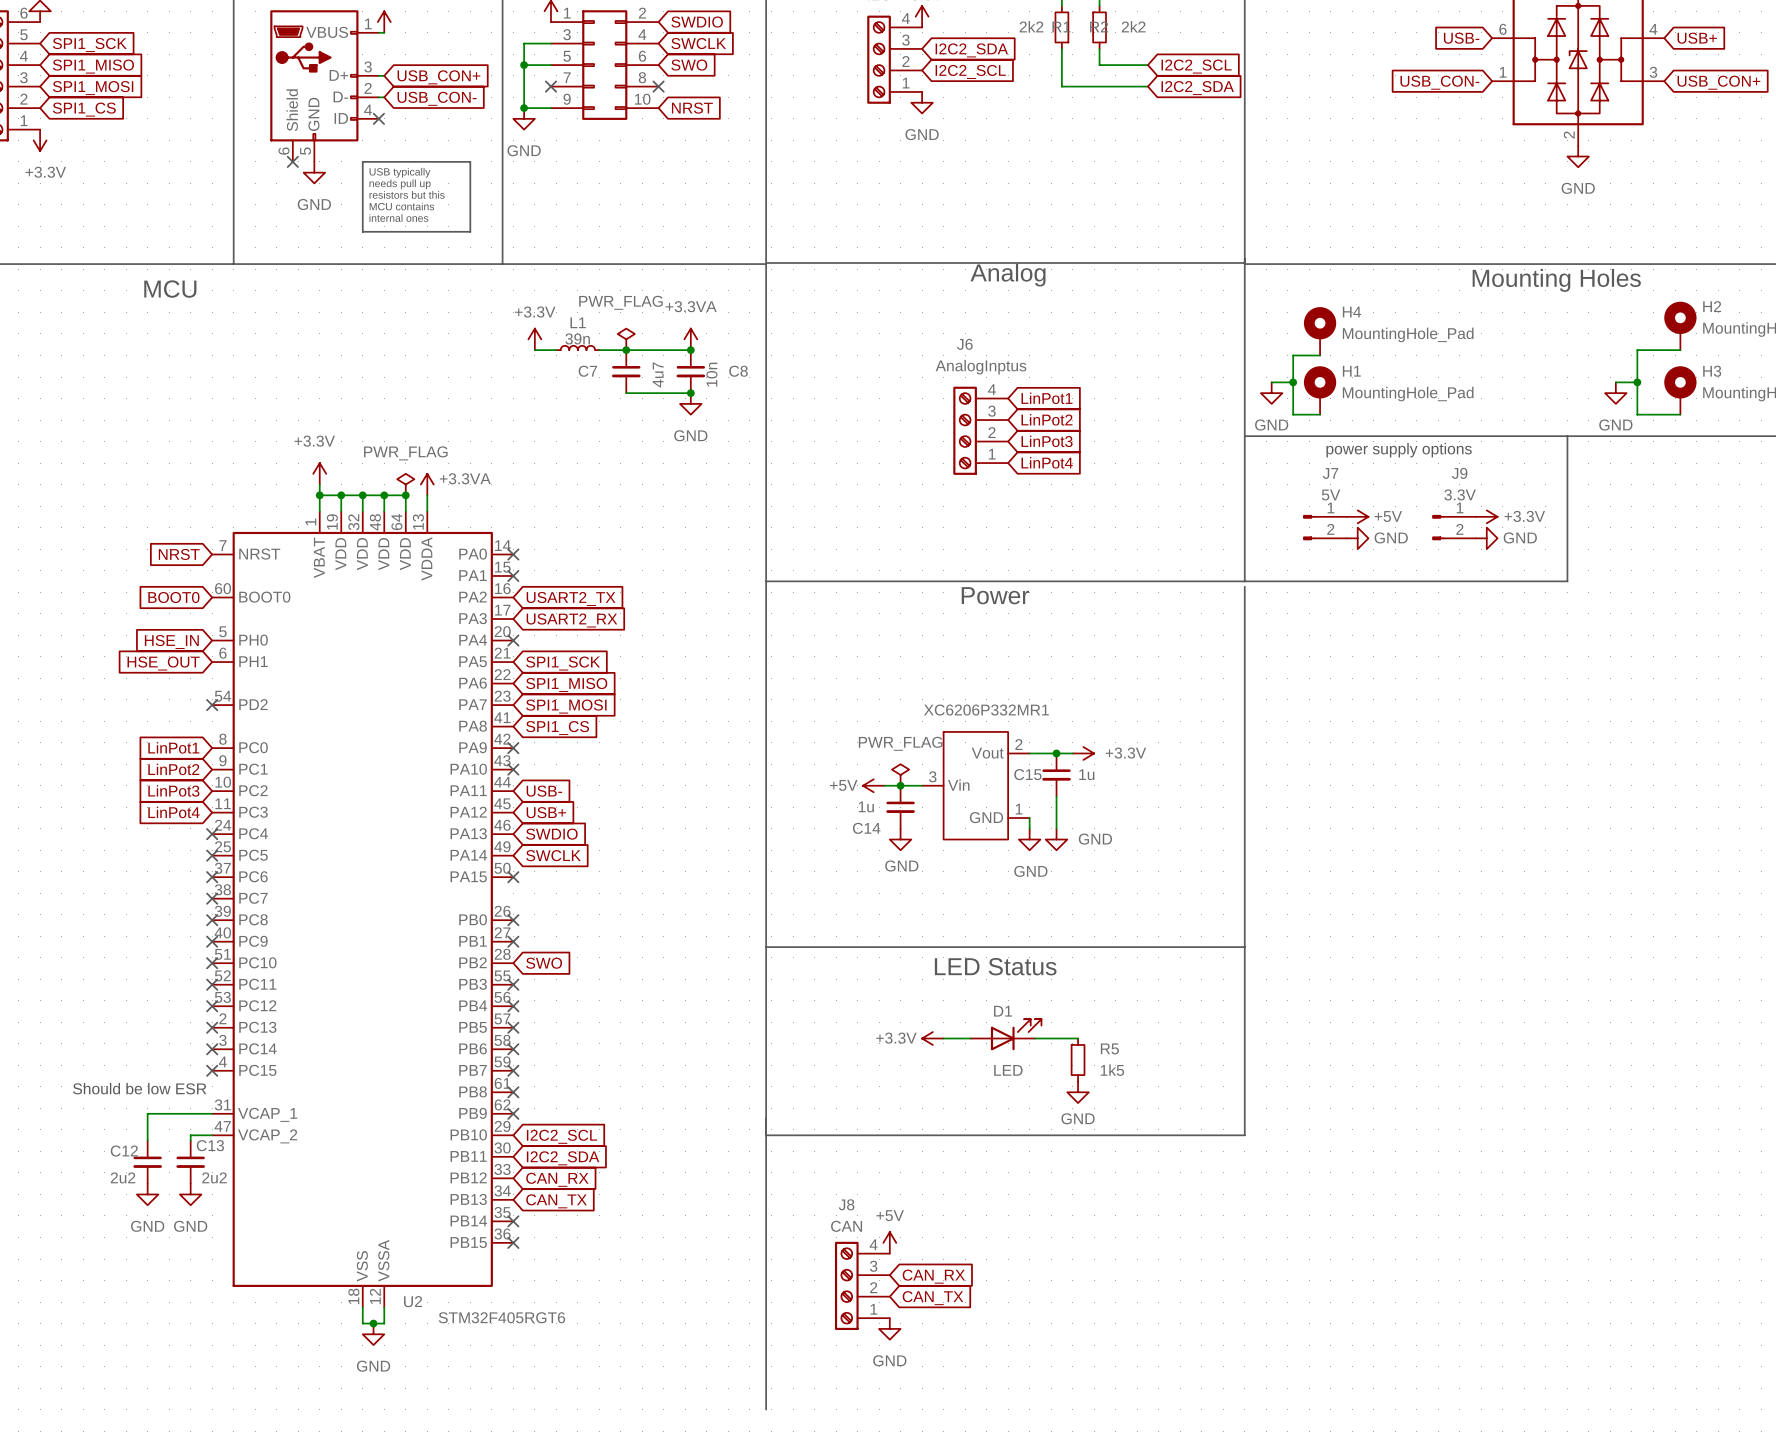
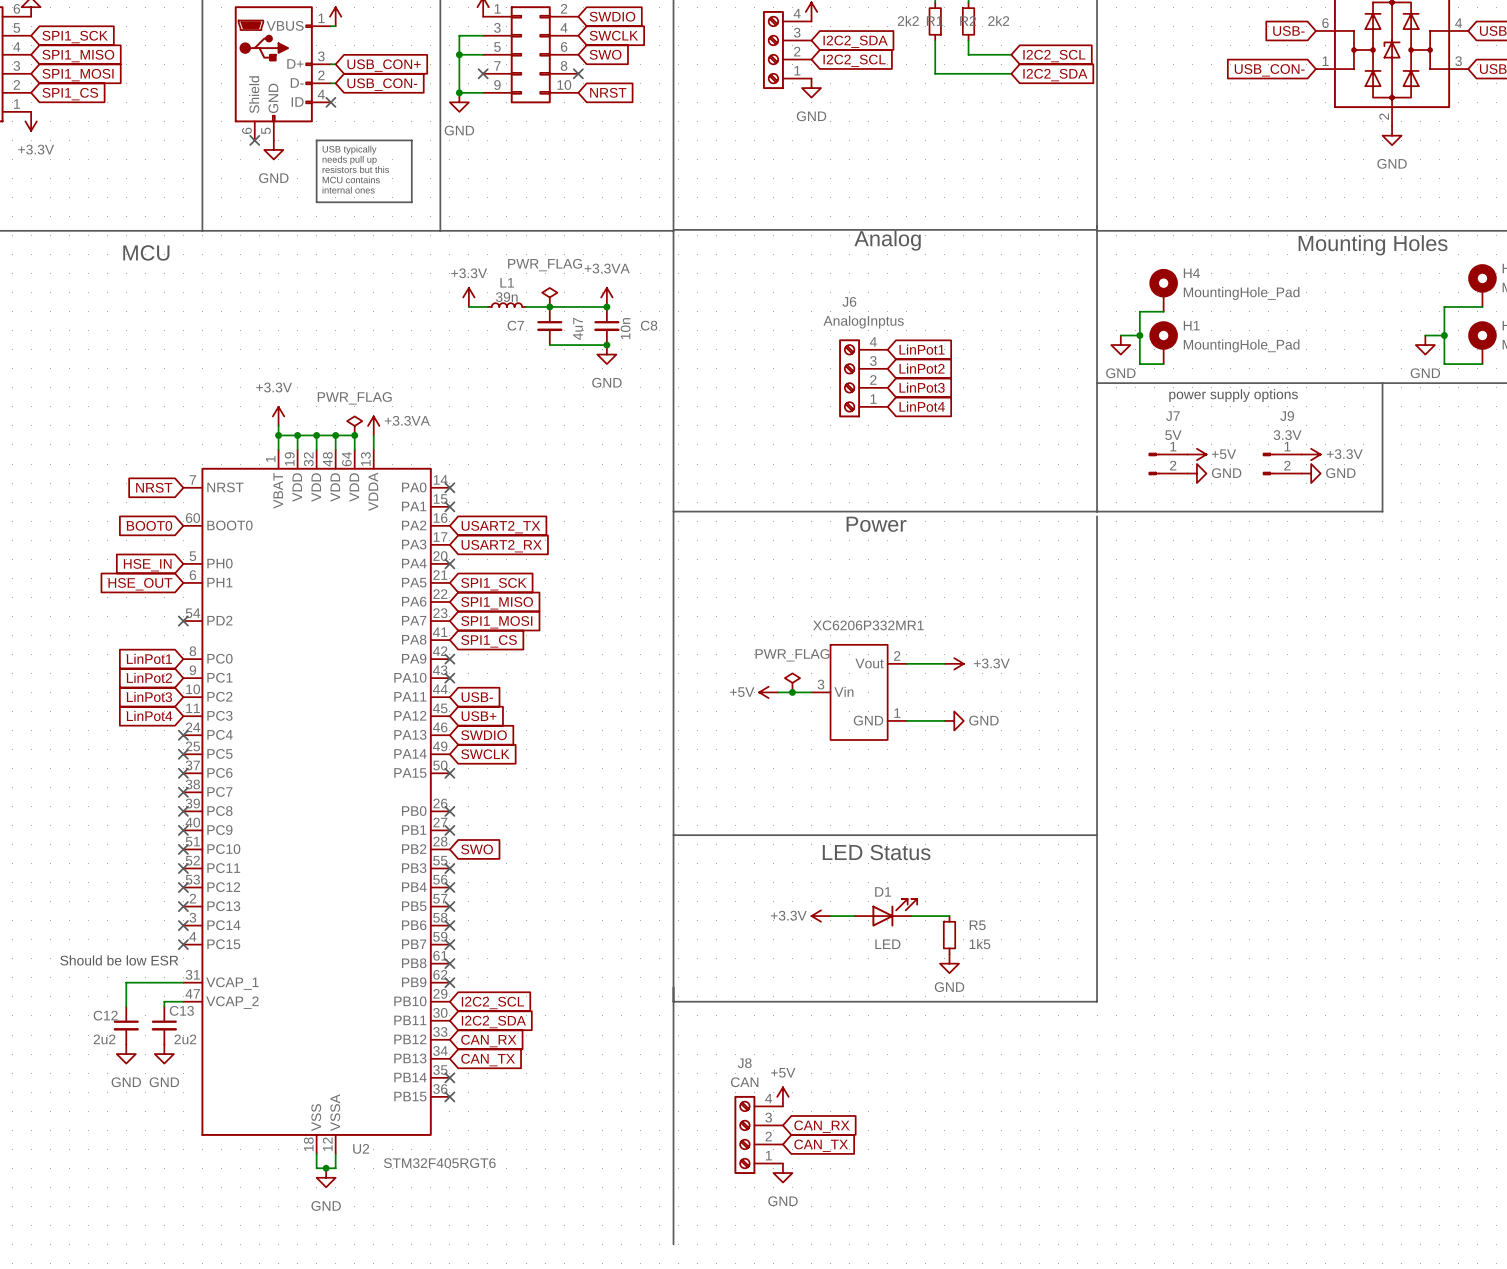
junction: (1056, 753) -> none
C15: 1u (1056, 774) -> none
wire: (1056, 796) (1056, 828) -> none
C14: 1u (900, 807) -> none
wire: (1029, 818) (1029, 828) -> (906, 720) (944, 720)
power symbol: none -> GND (954, 720)
power symbol: GND (900, 839) -> none
power symbol: GND (1029, 839) -> none
power symbol: GND (1056, 839) -> none

